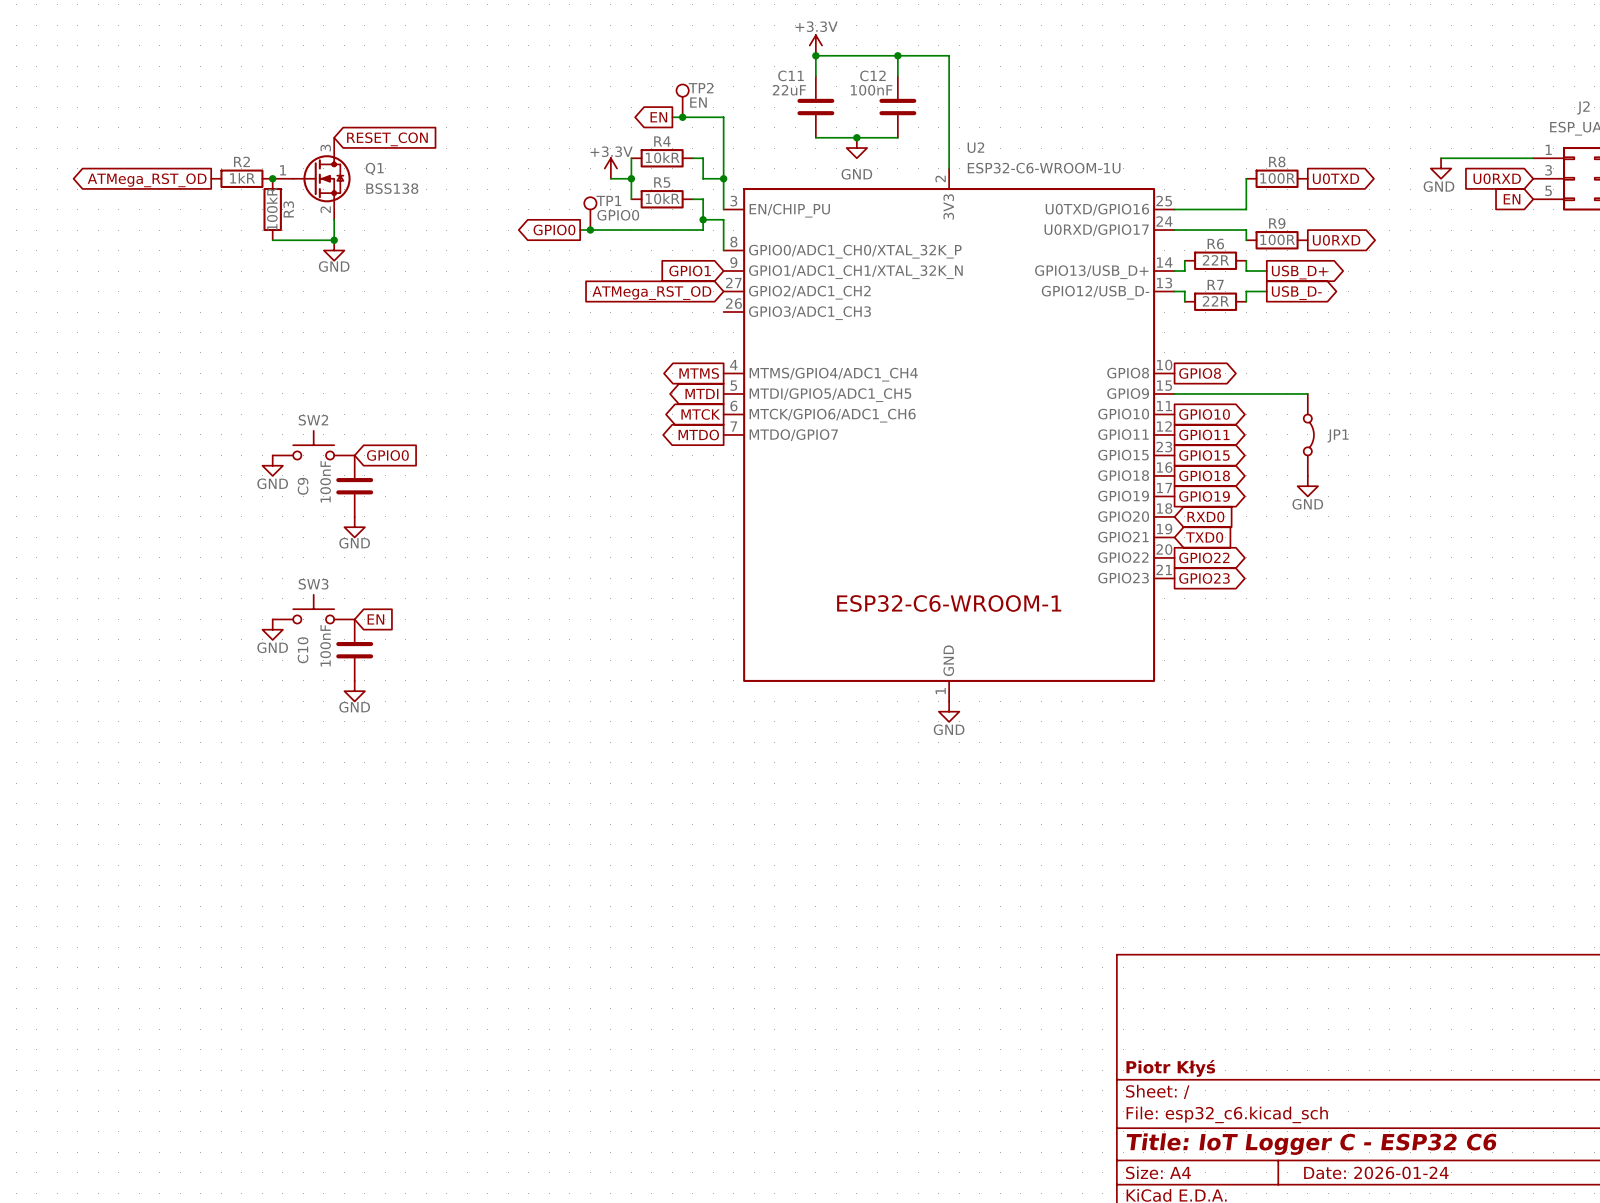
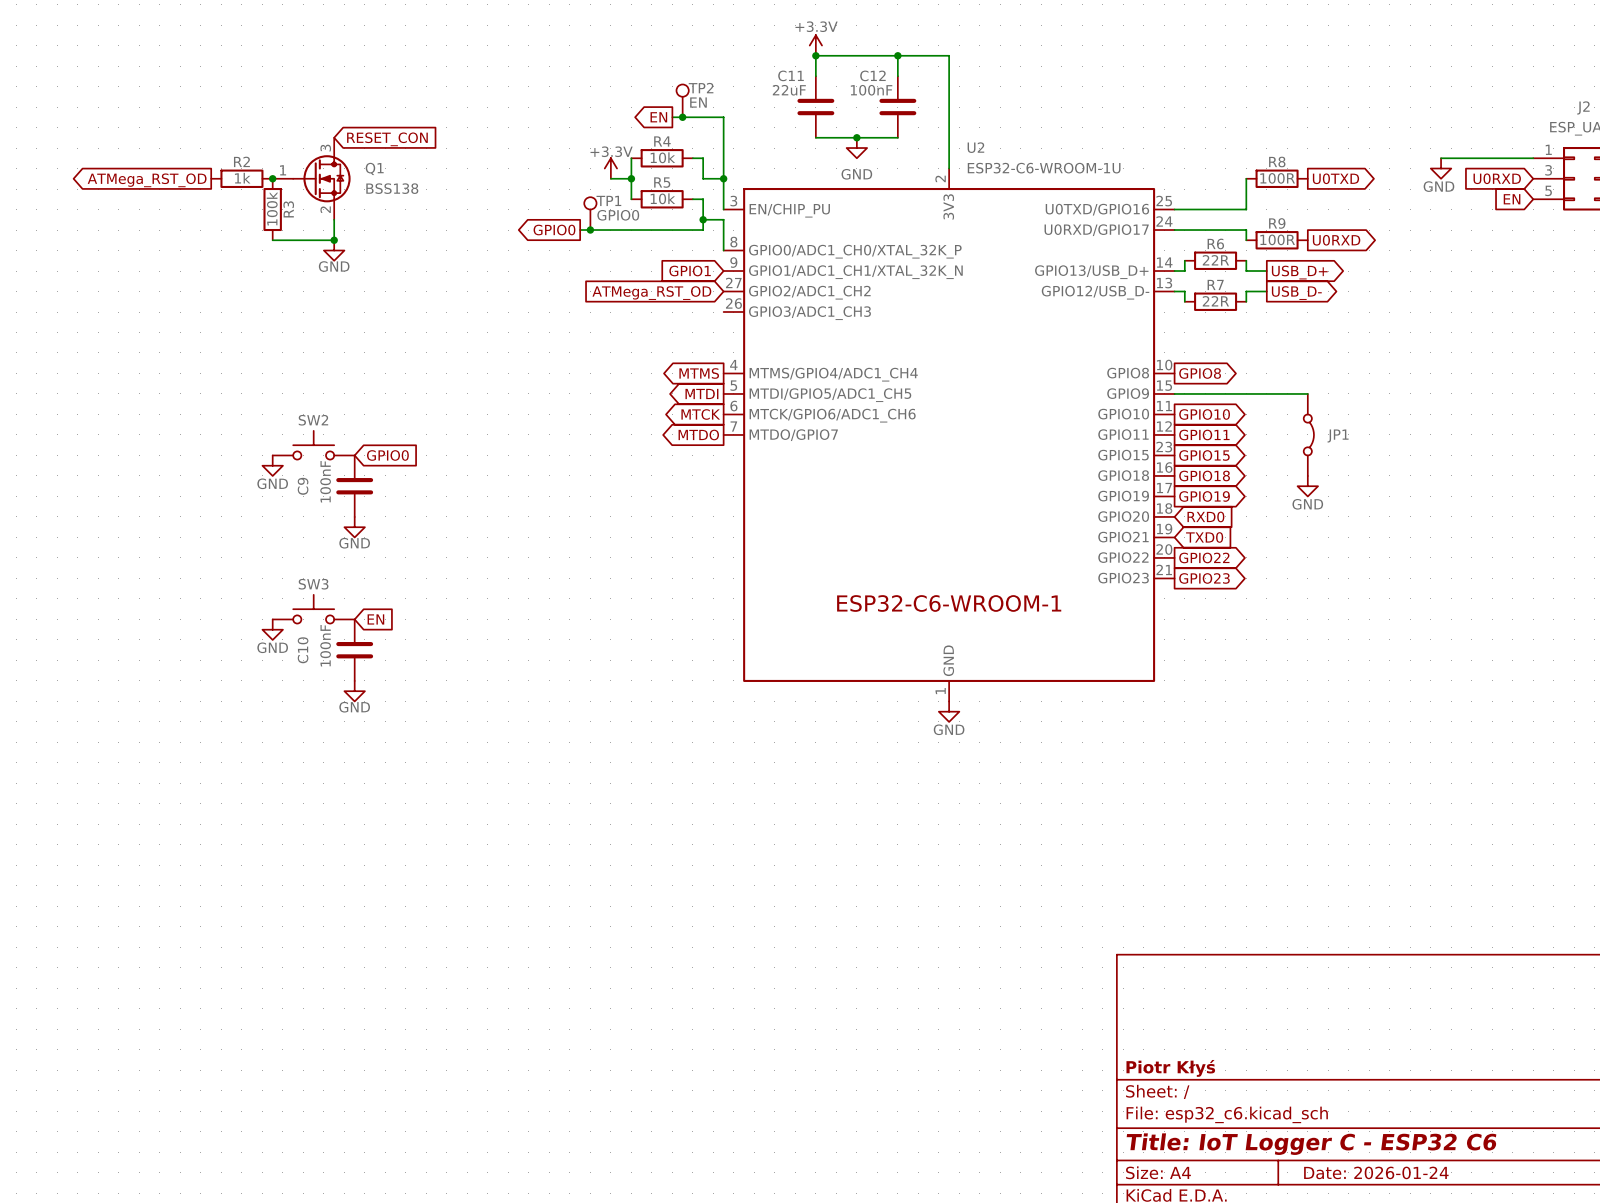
R4 value: 10kR (662, 157) -> 10k (662, 157)
R2 value: 1kR (242, 178) -> 1k (242, 178)
R5 value: 10kR (662, 198) -> 10k (662, 198)
R3 value: 100kR (272, 208) -> 100k (272, 208)

